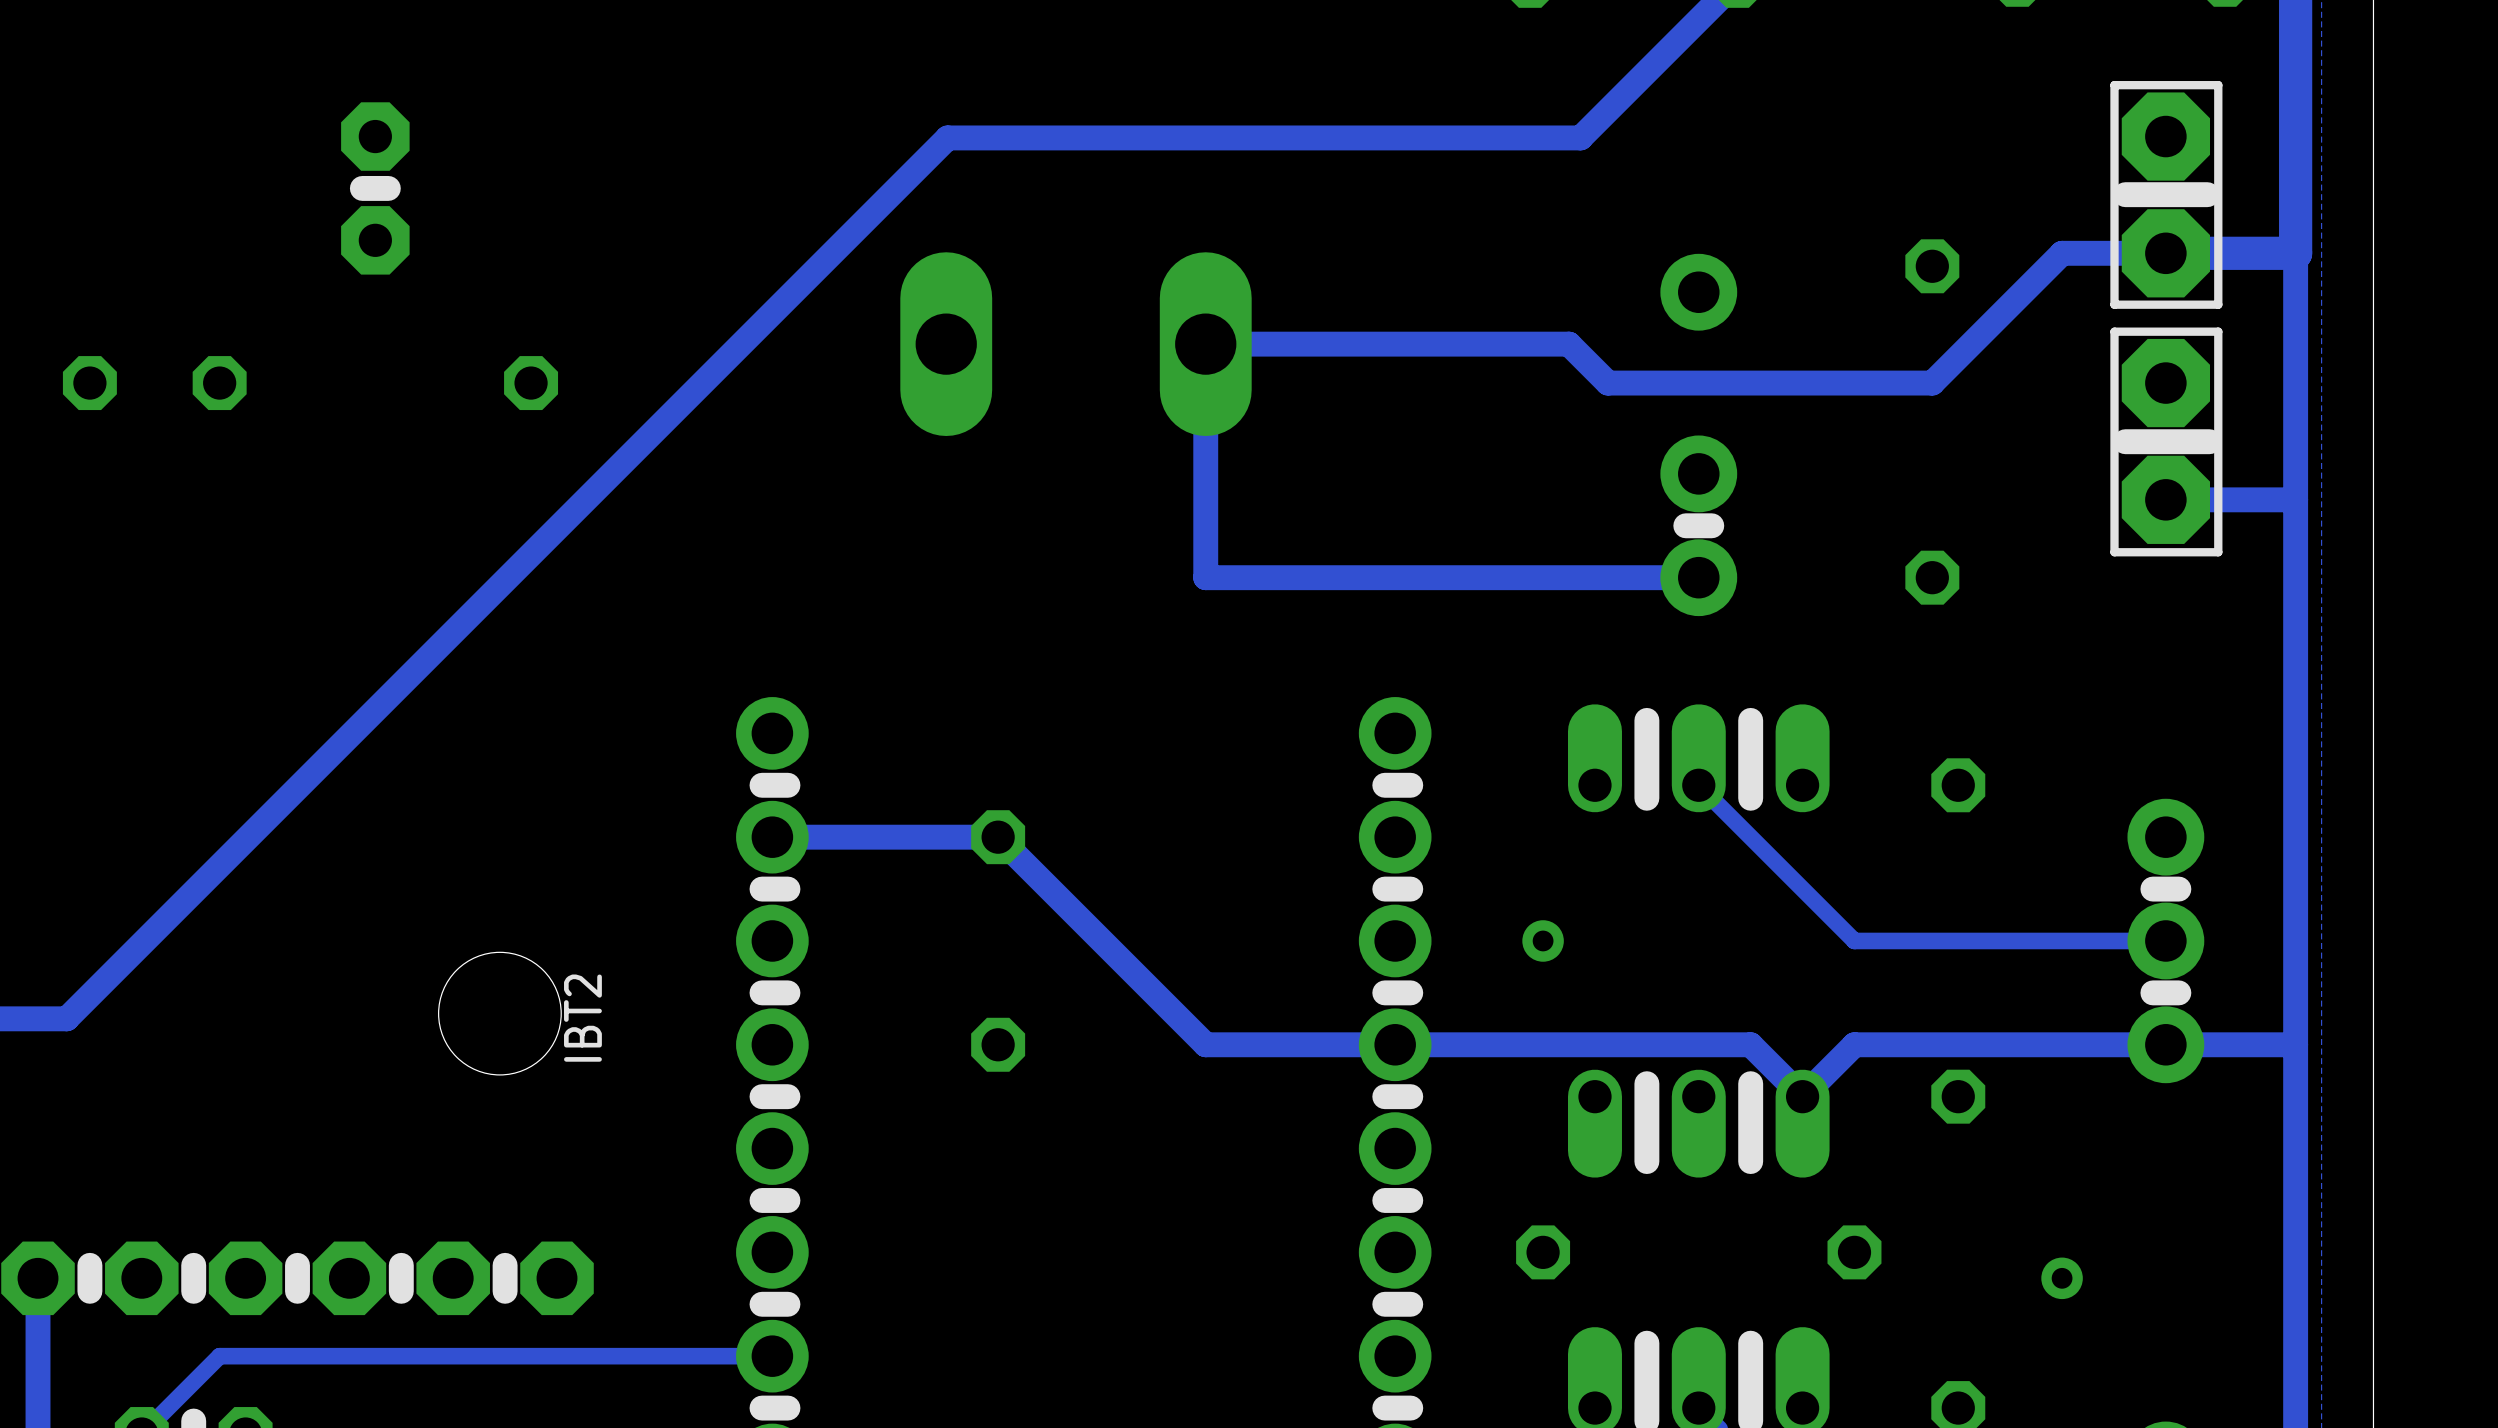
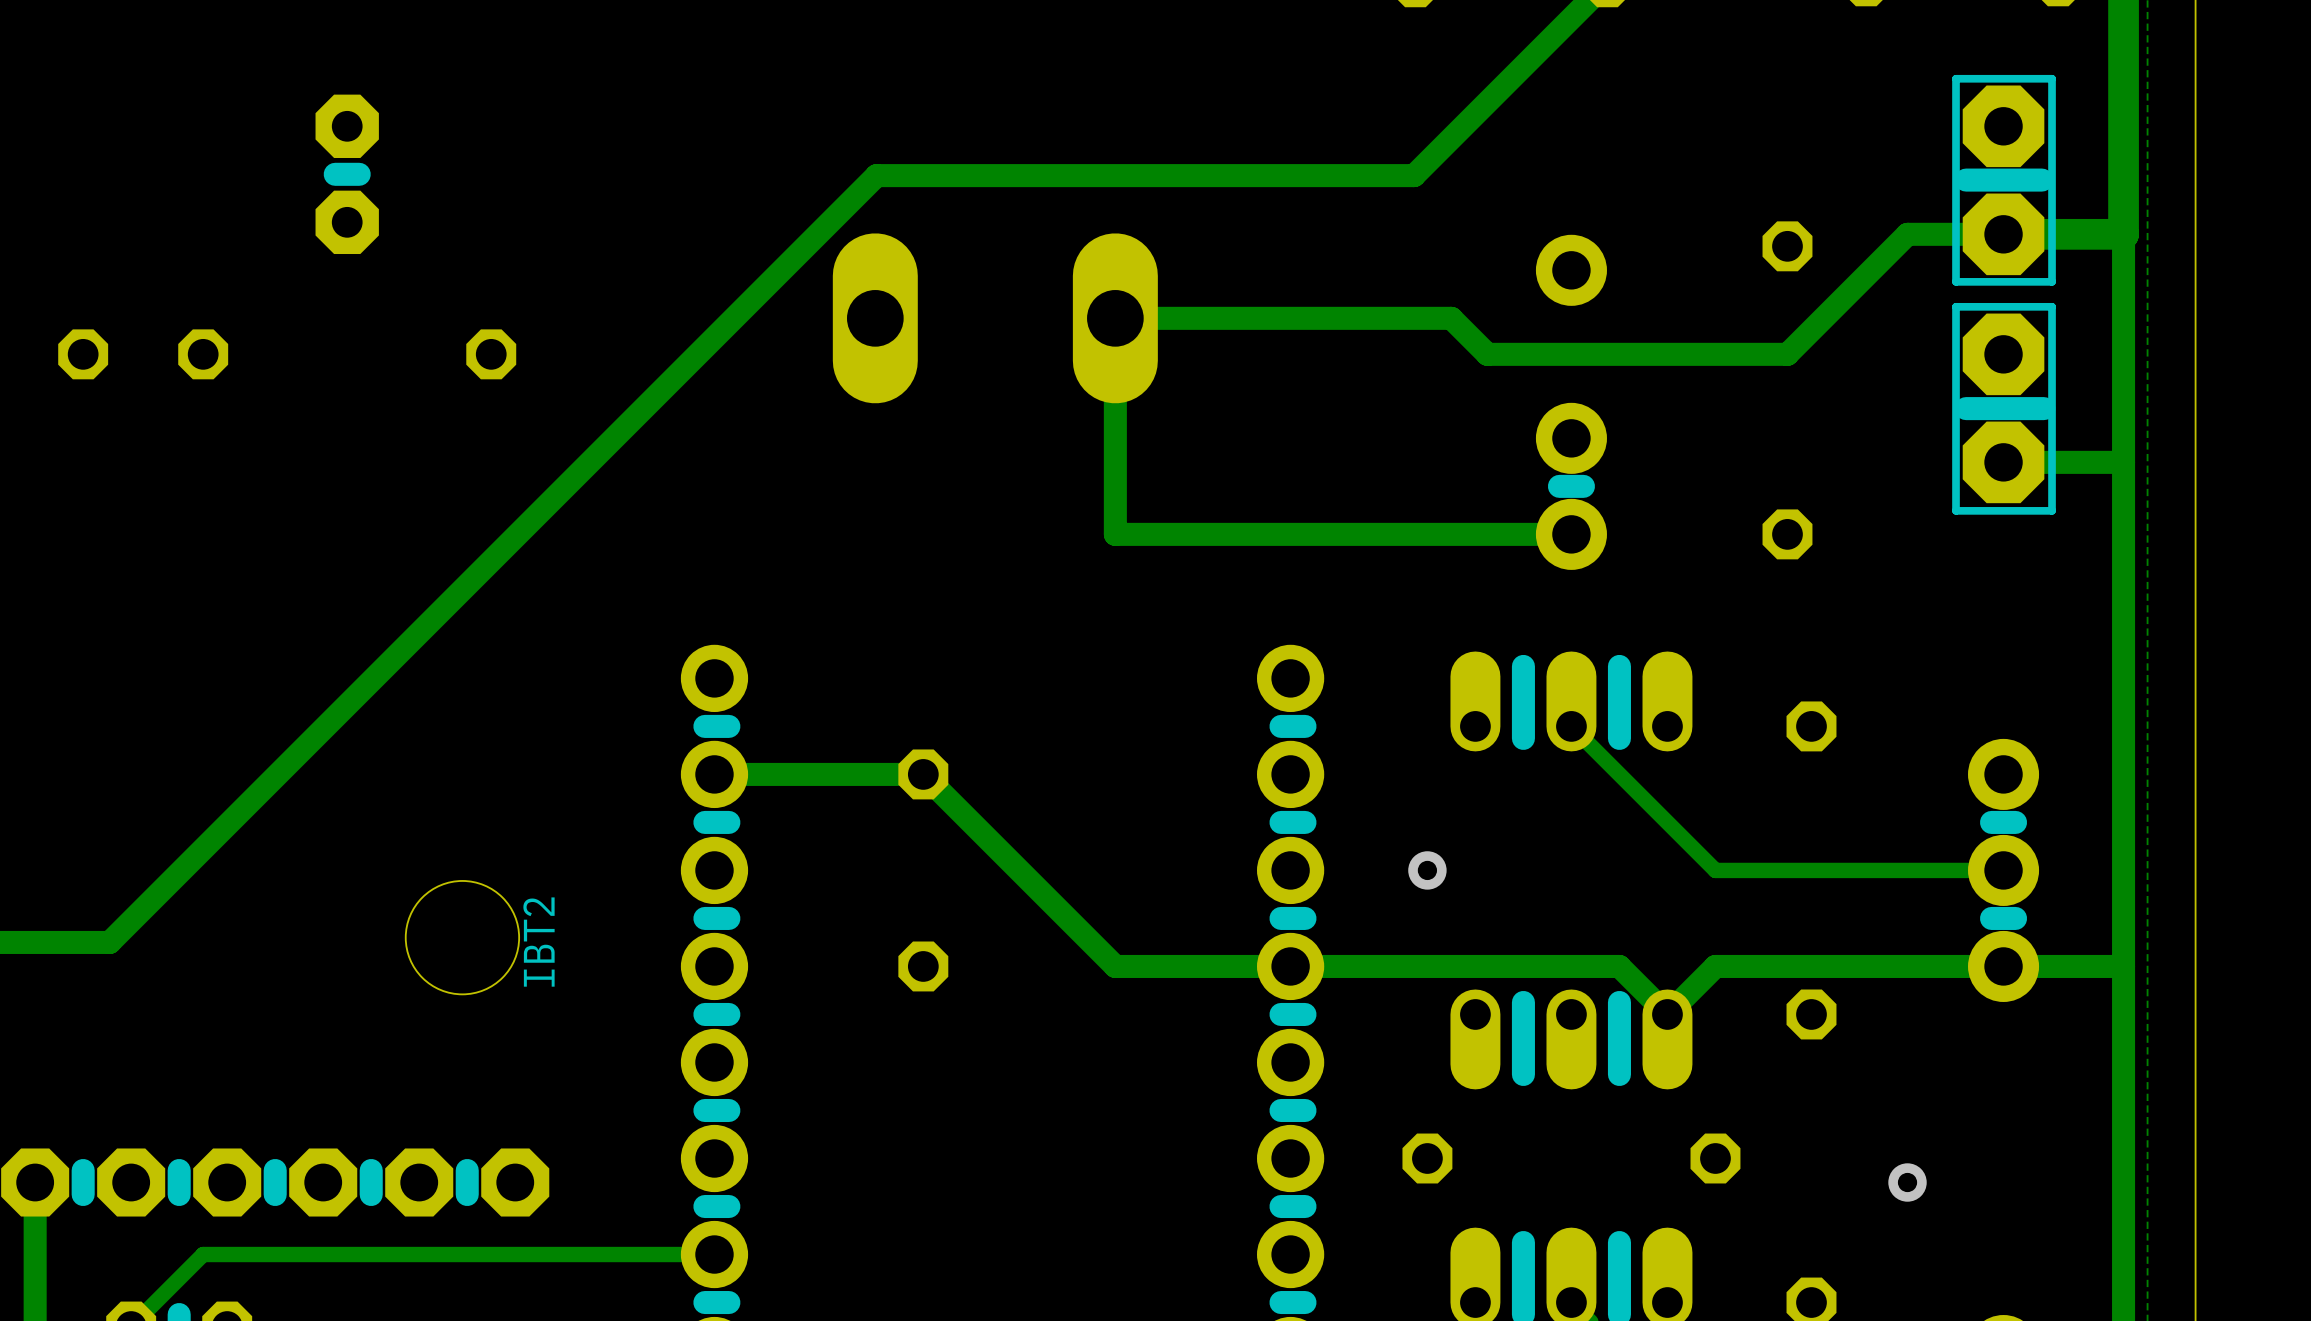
track: (1580, 137) (947, 137) (66, 1018) -> (1462, 127) (1414, 175) (876, 175) (109, 942) (61, 942)

